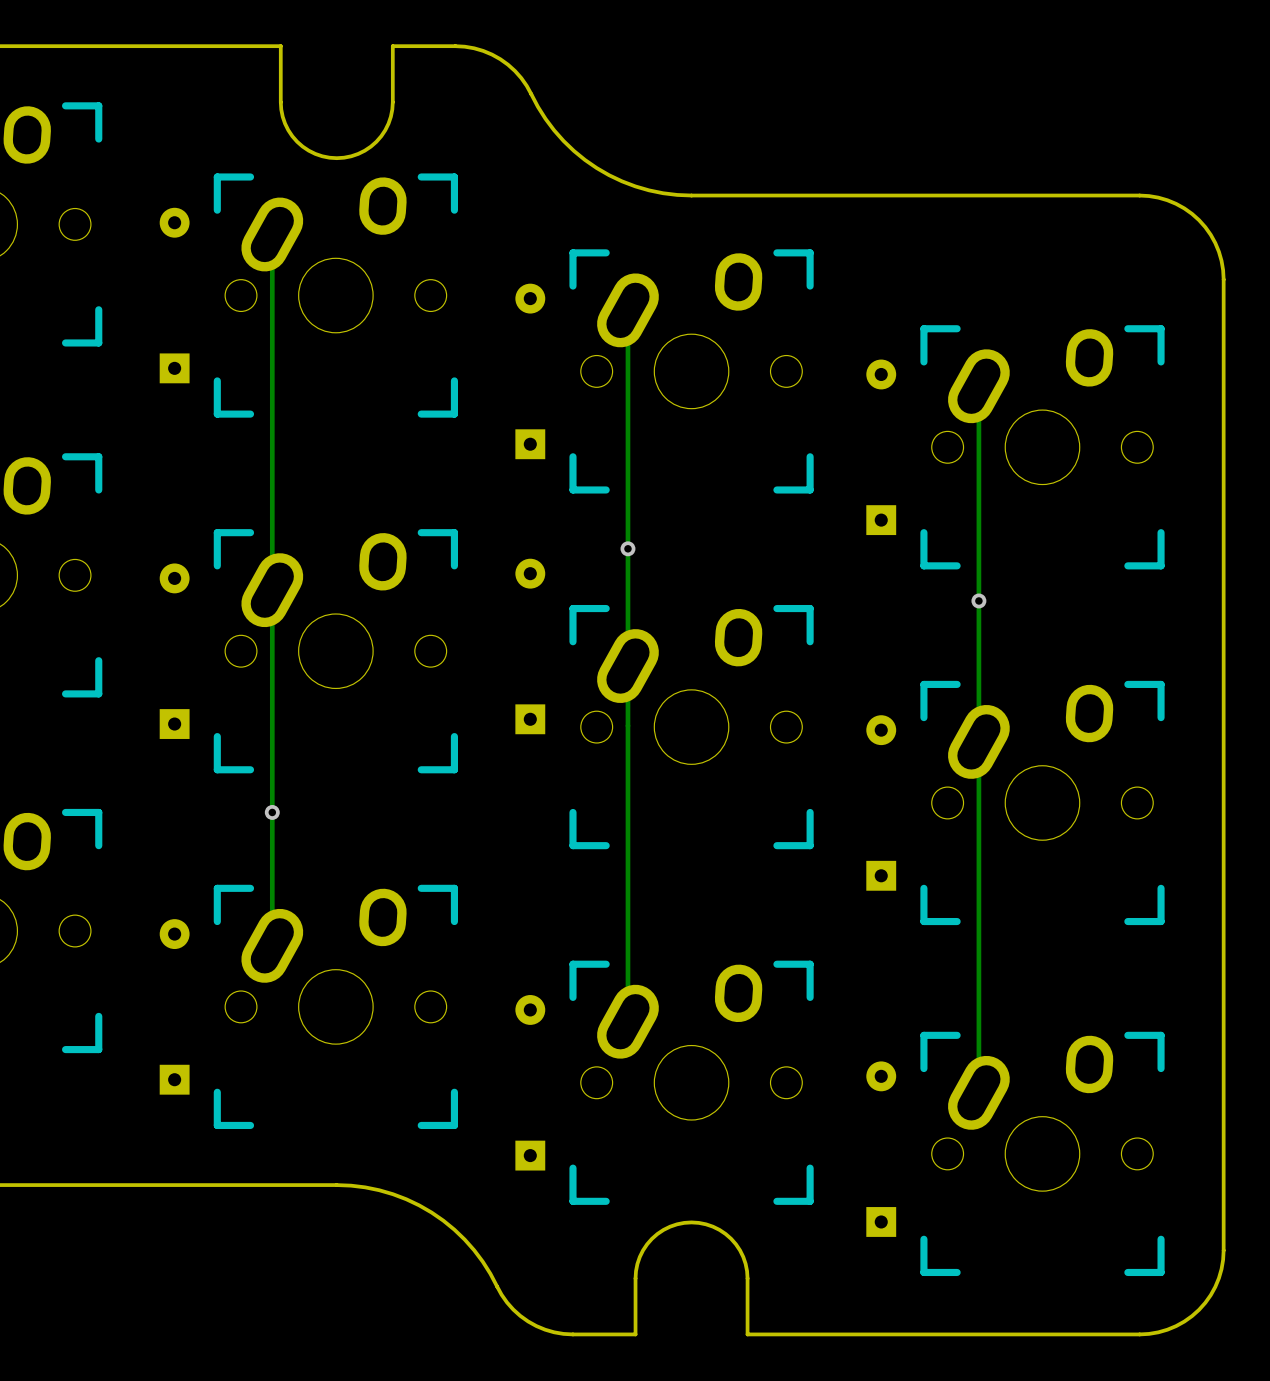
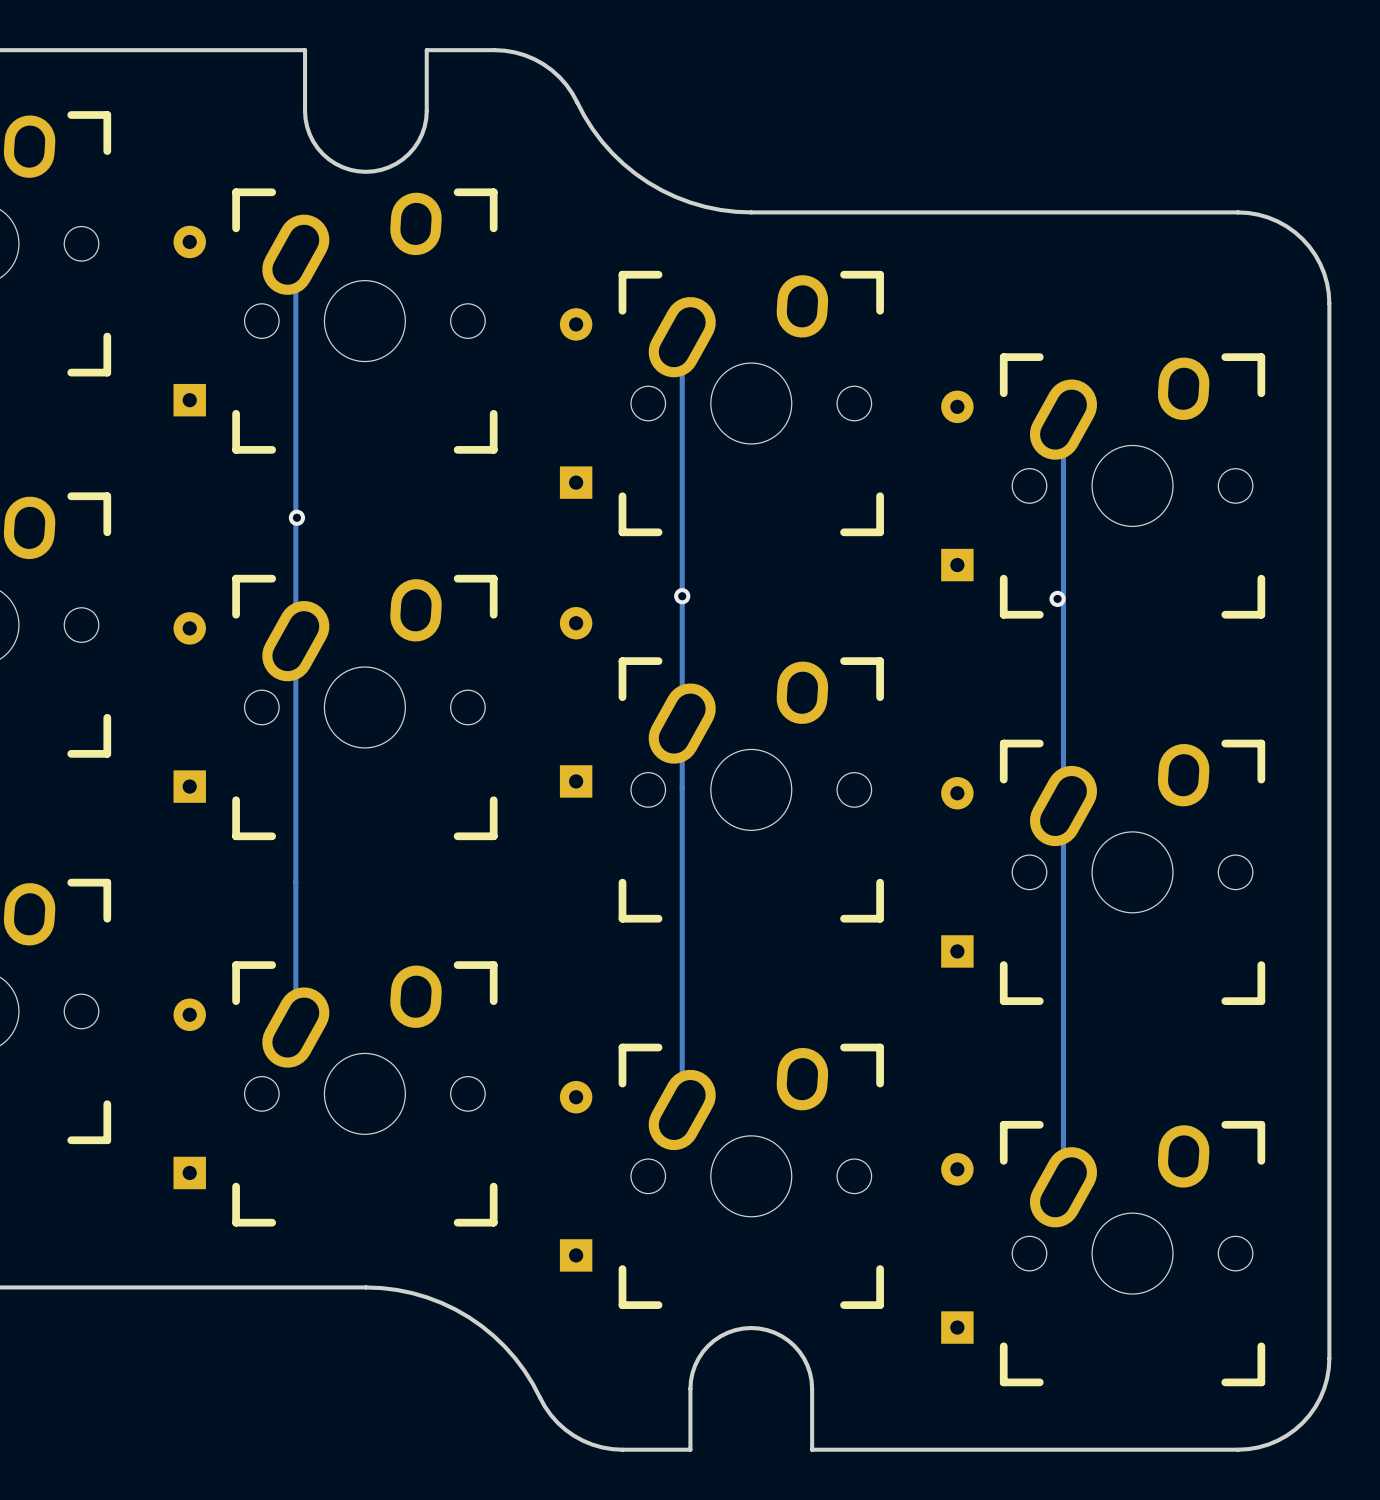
via: none -> (296, 517)
via position: (978, 600) -> (1057, 598)
via: (272, 812) -> none

